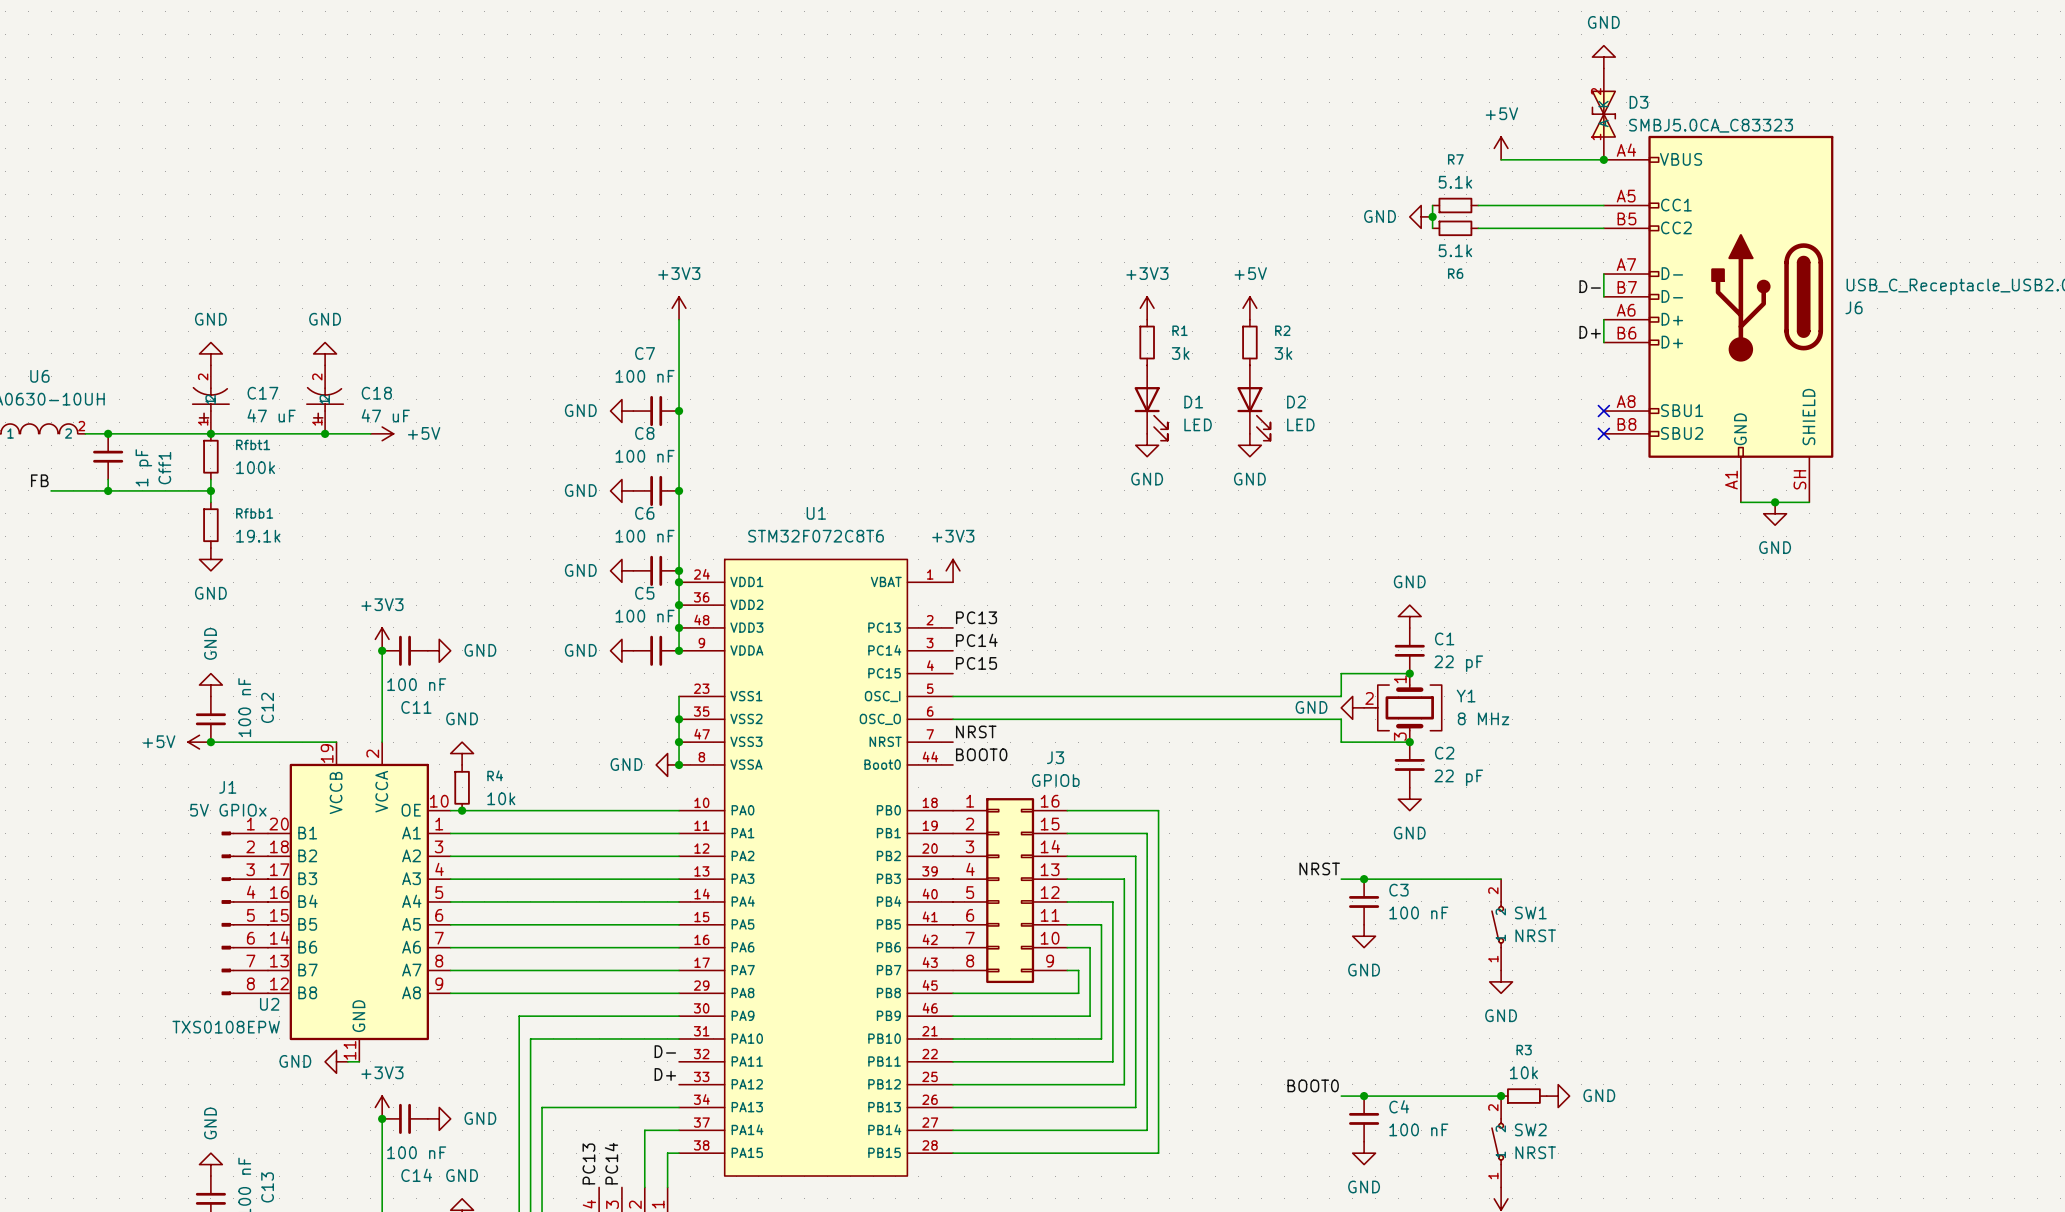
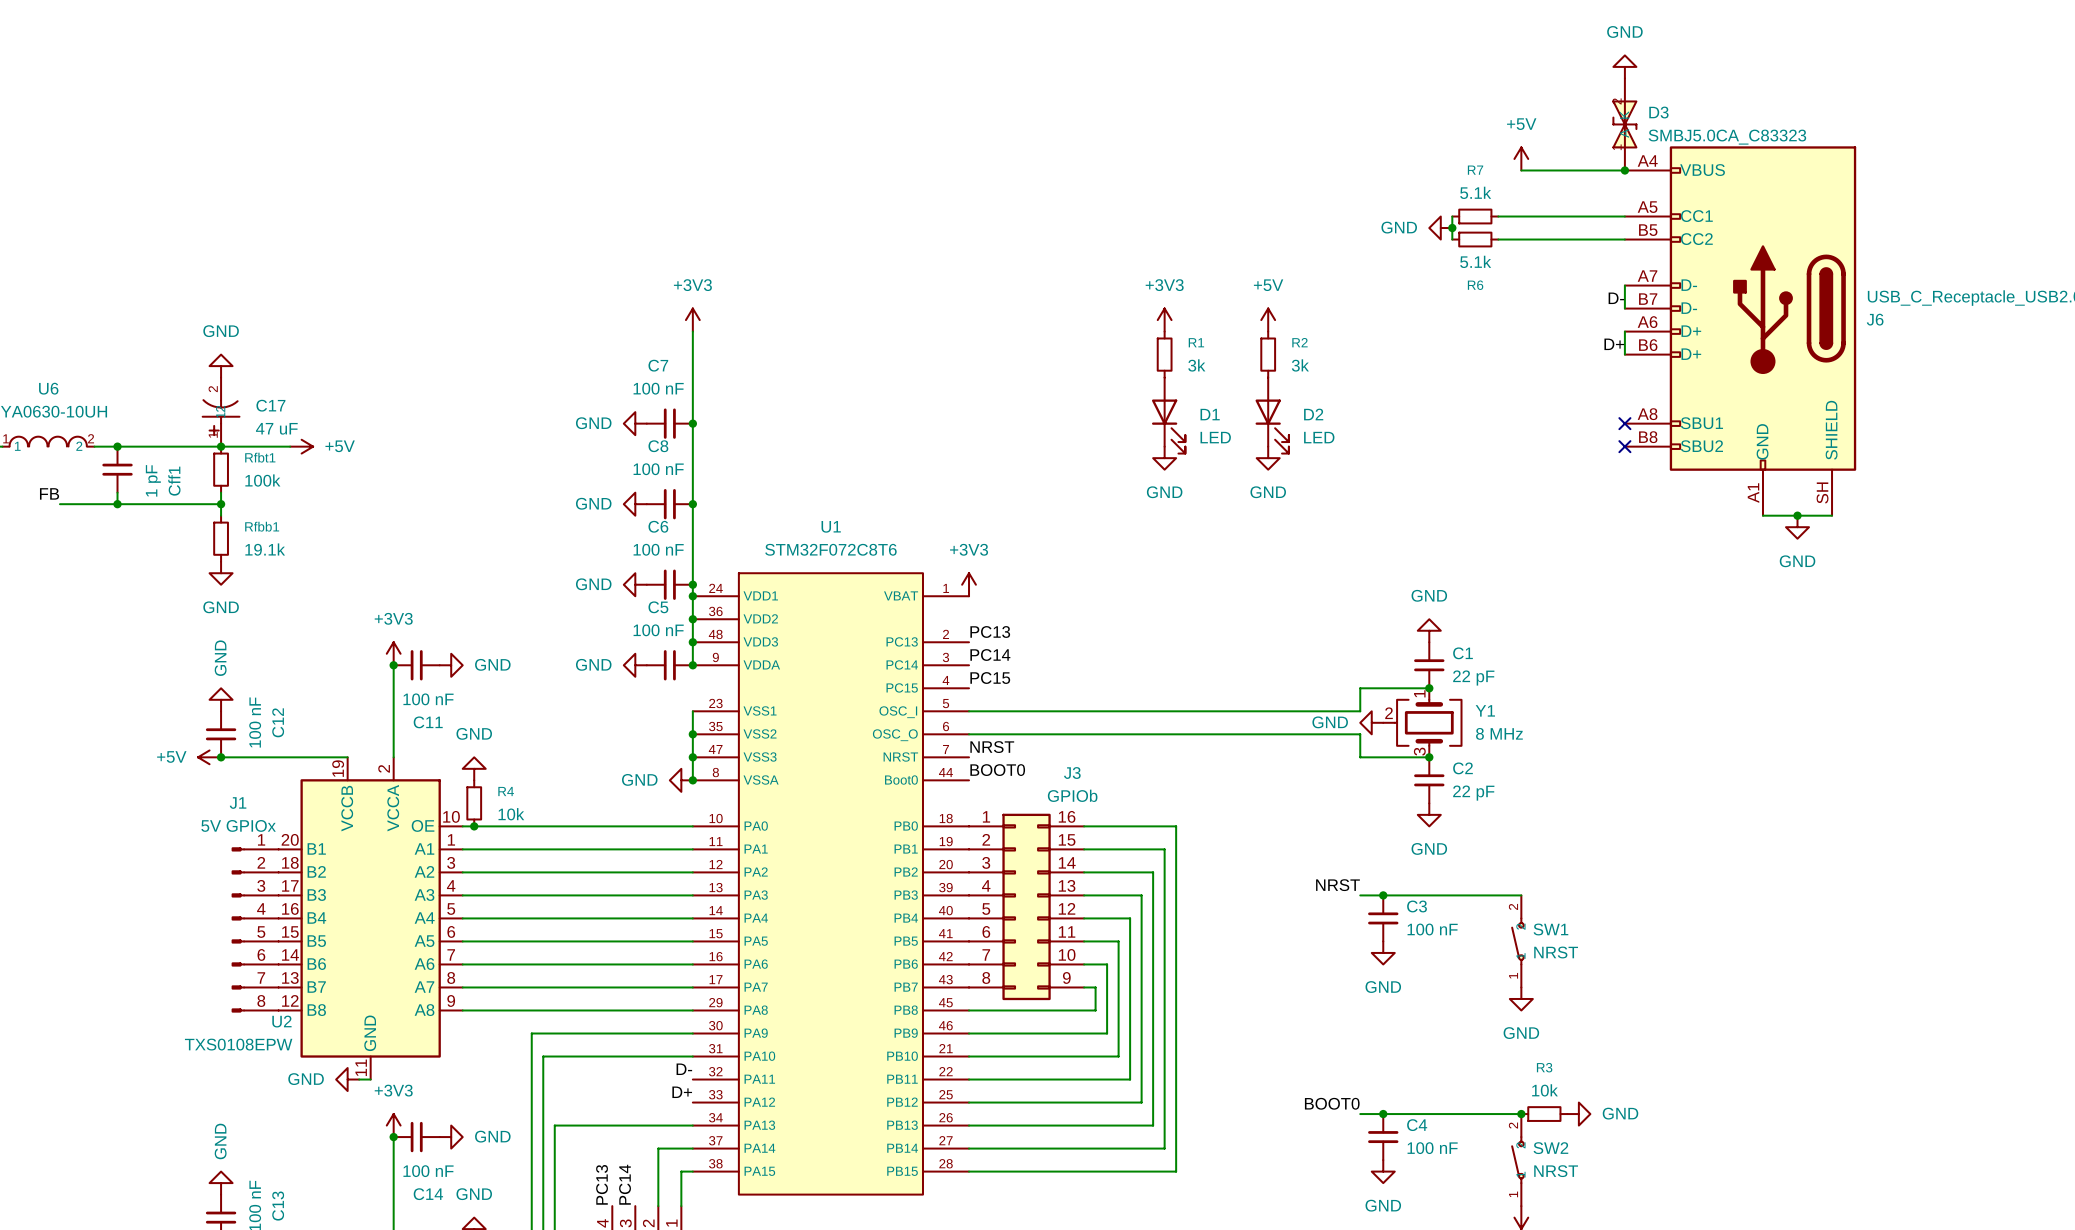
power symbol: GND (325, 353) -> none
C18: 47 uF (325, 399) -> none
wire: (279, 433) (370, 433) -> none
junction: (325, 433) -> none
power symbol position: +5V (382, 433) -> +5V (301, 446)

